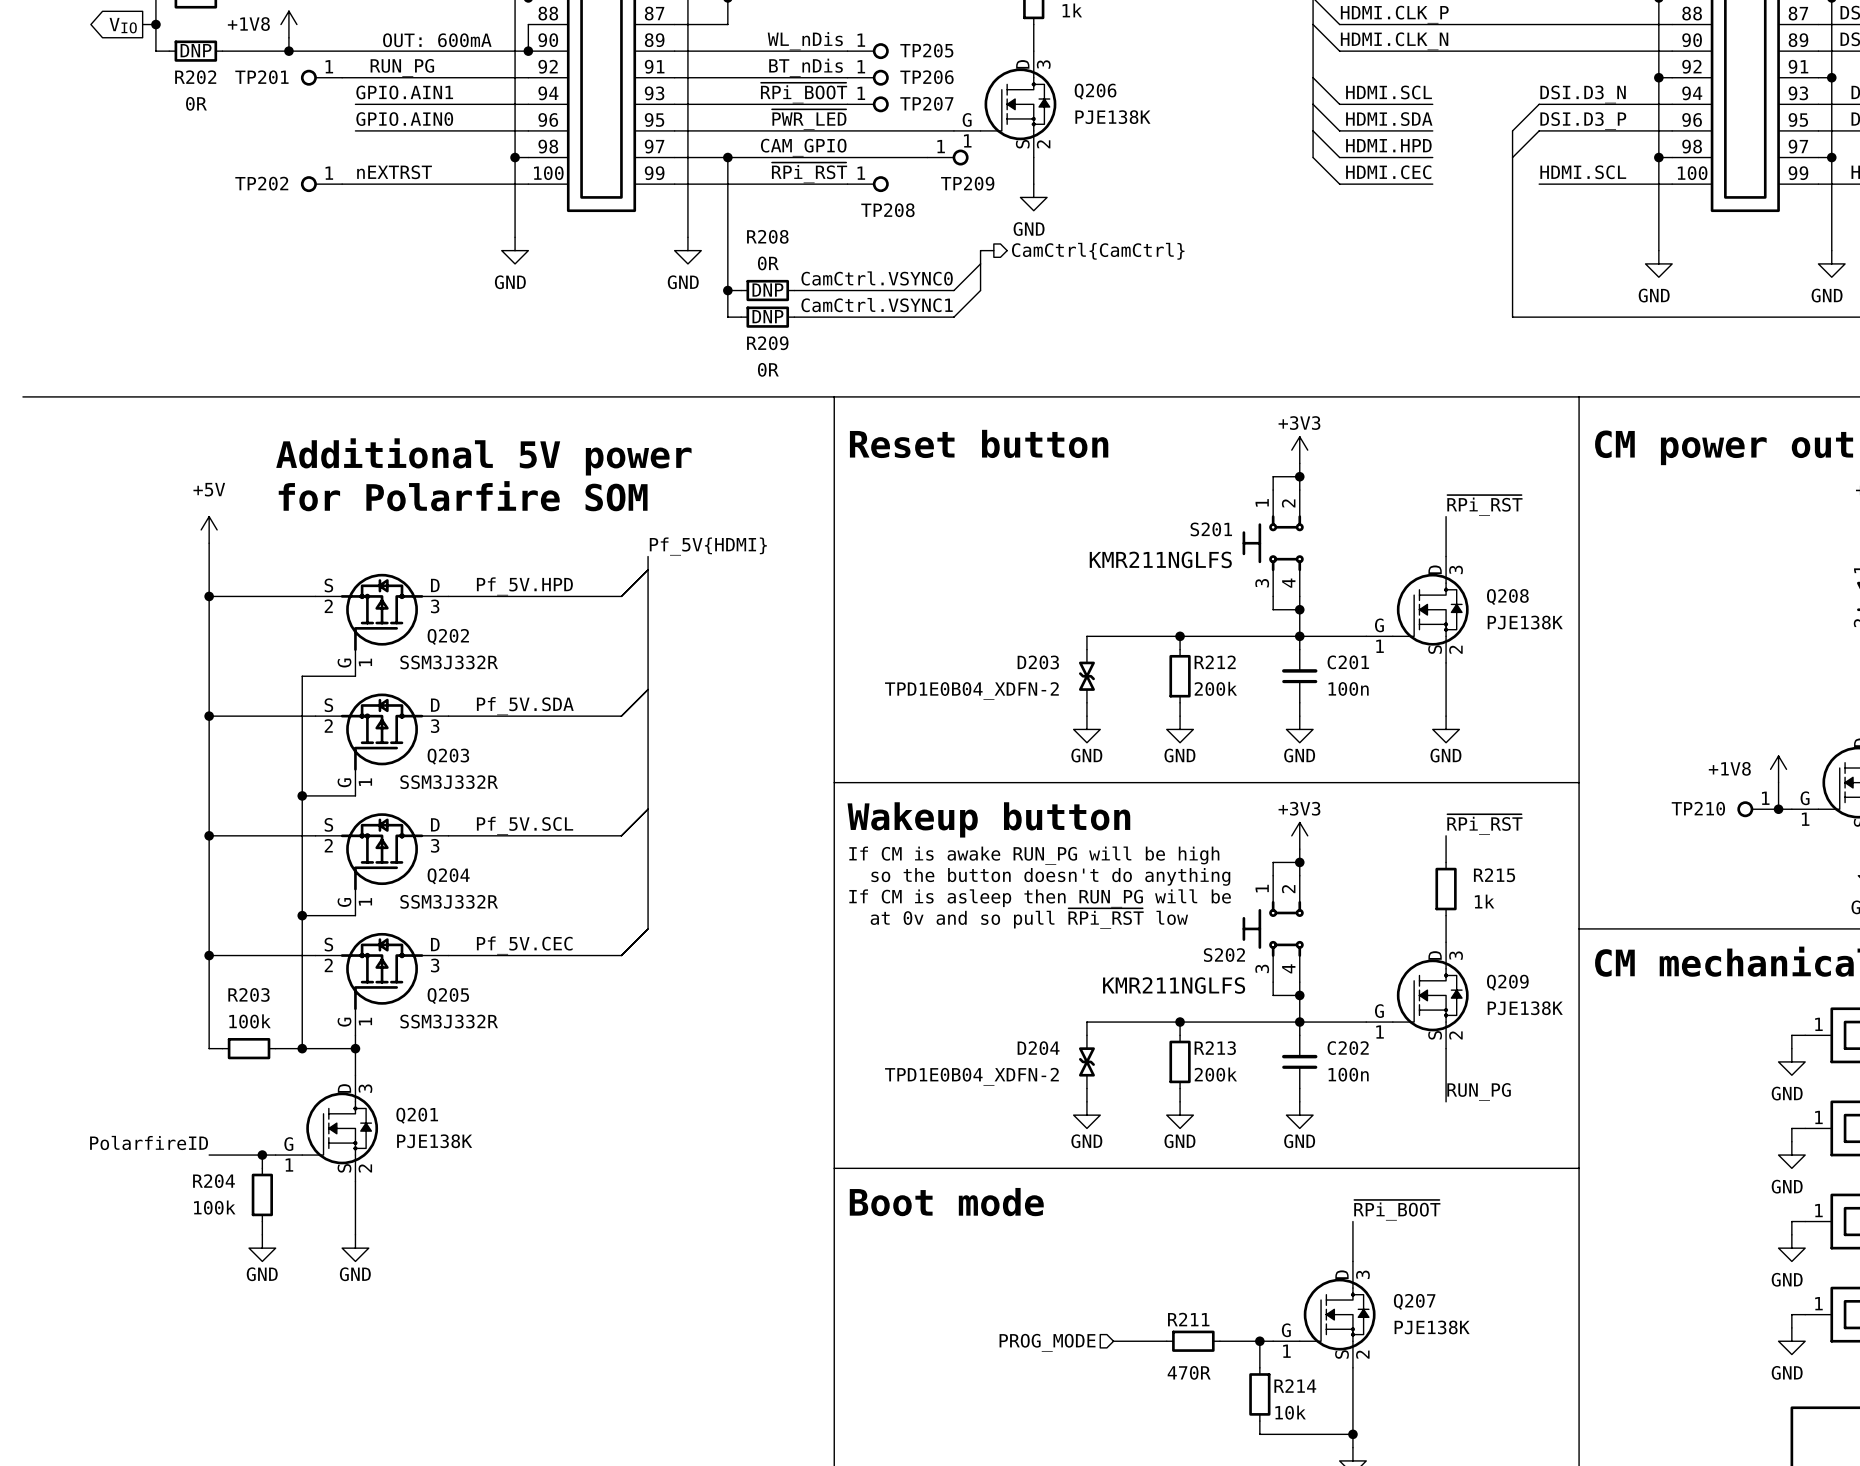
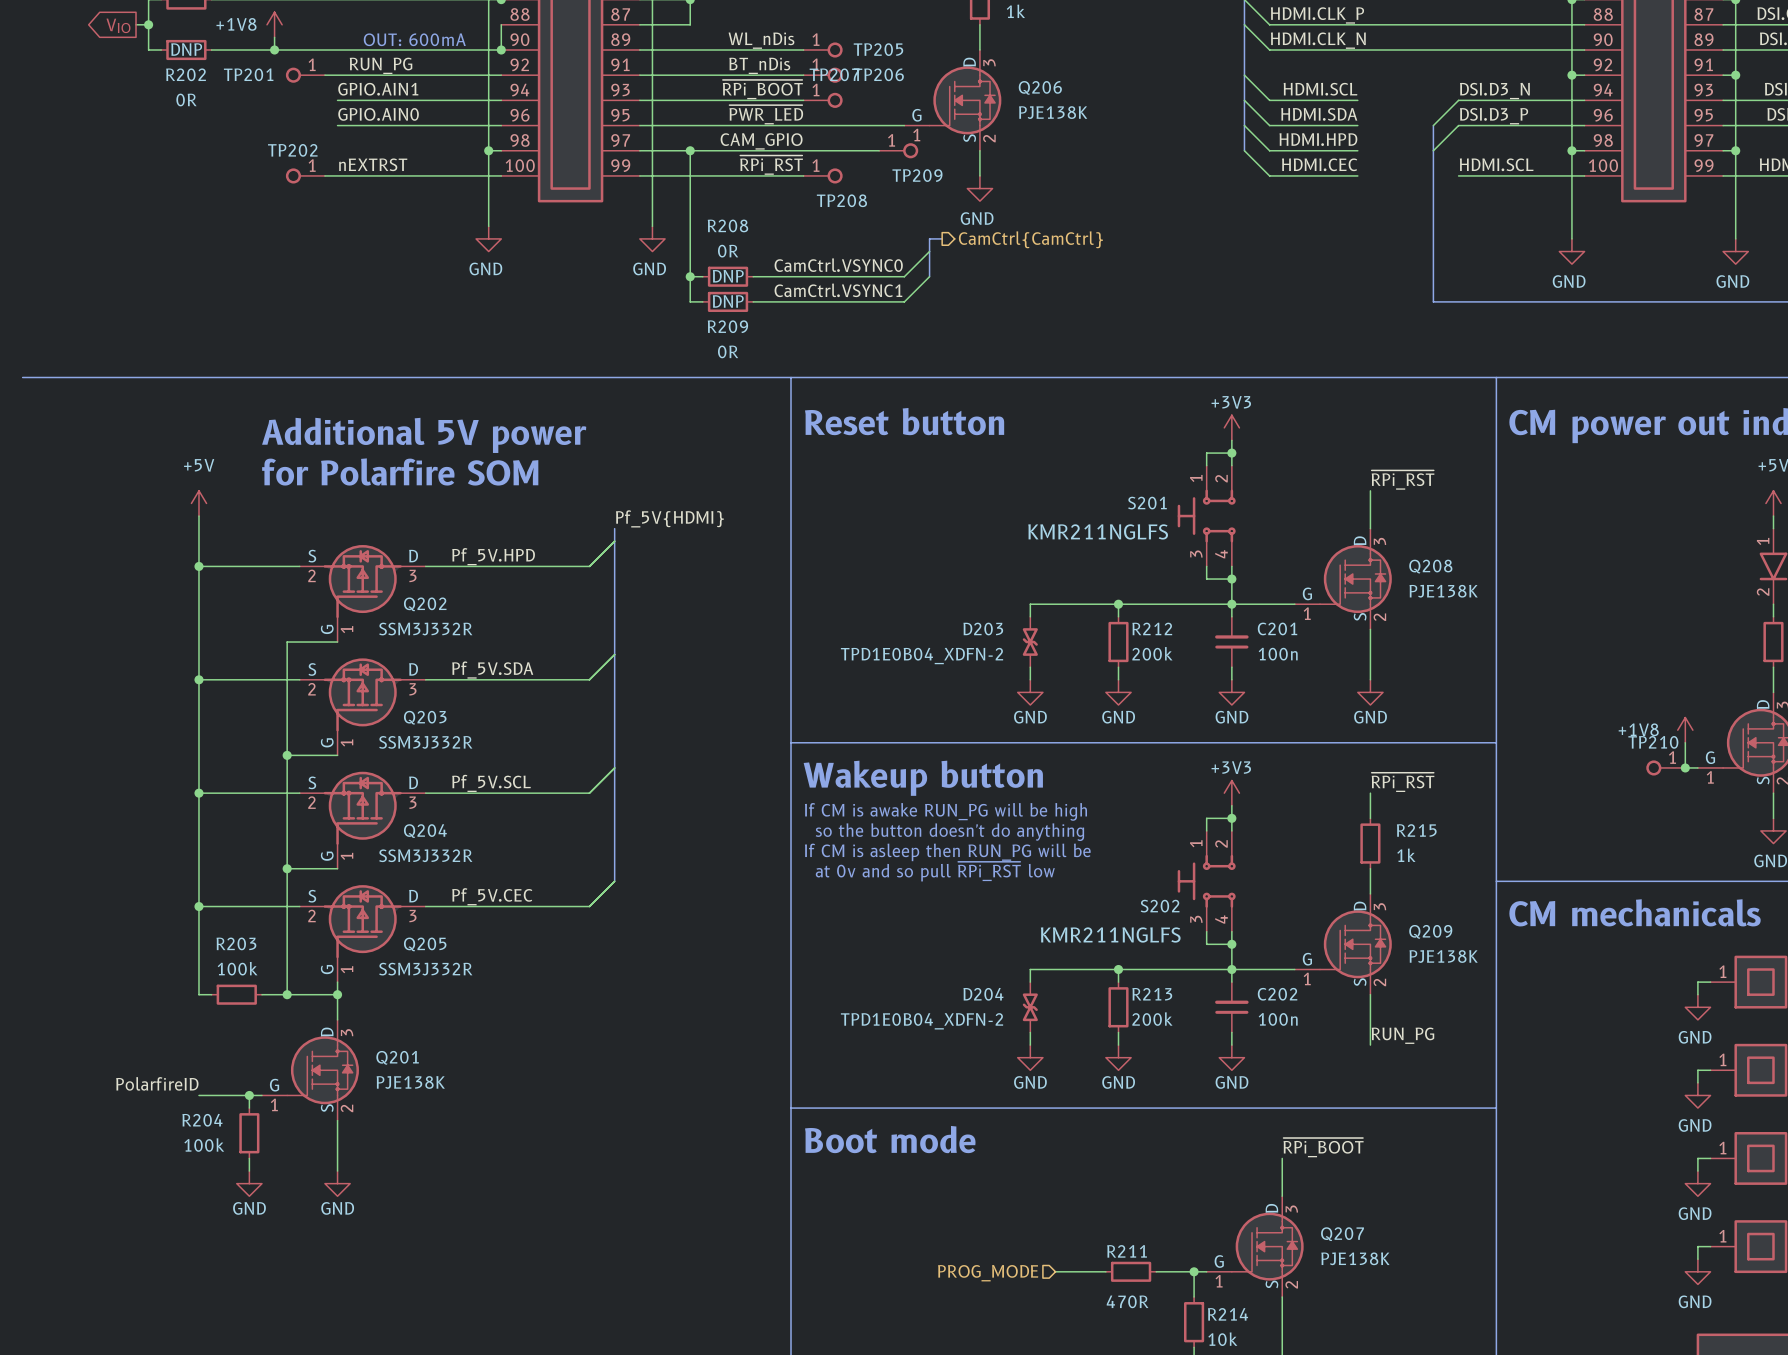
TP207 name position: TP207 (926, 103) -> TP207 (834, 74)
TP202 name position: TP202 (261, 183) -> TP202 (292, 150)
TP210 name position: TP210 (1698, 808) -> TP210 (1653, 742)

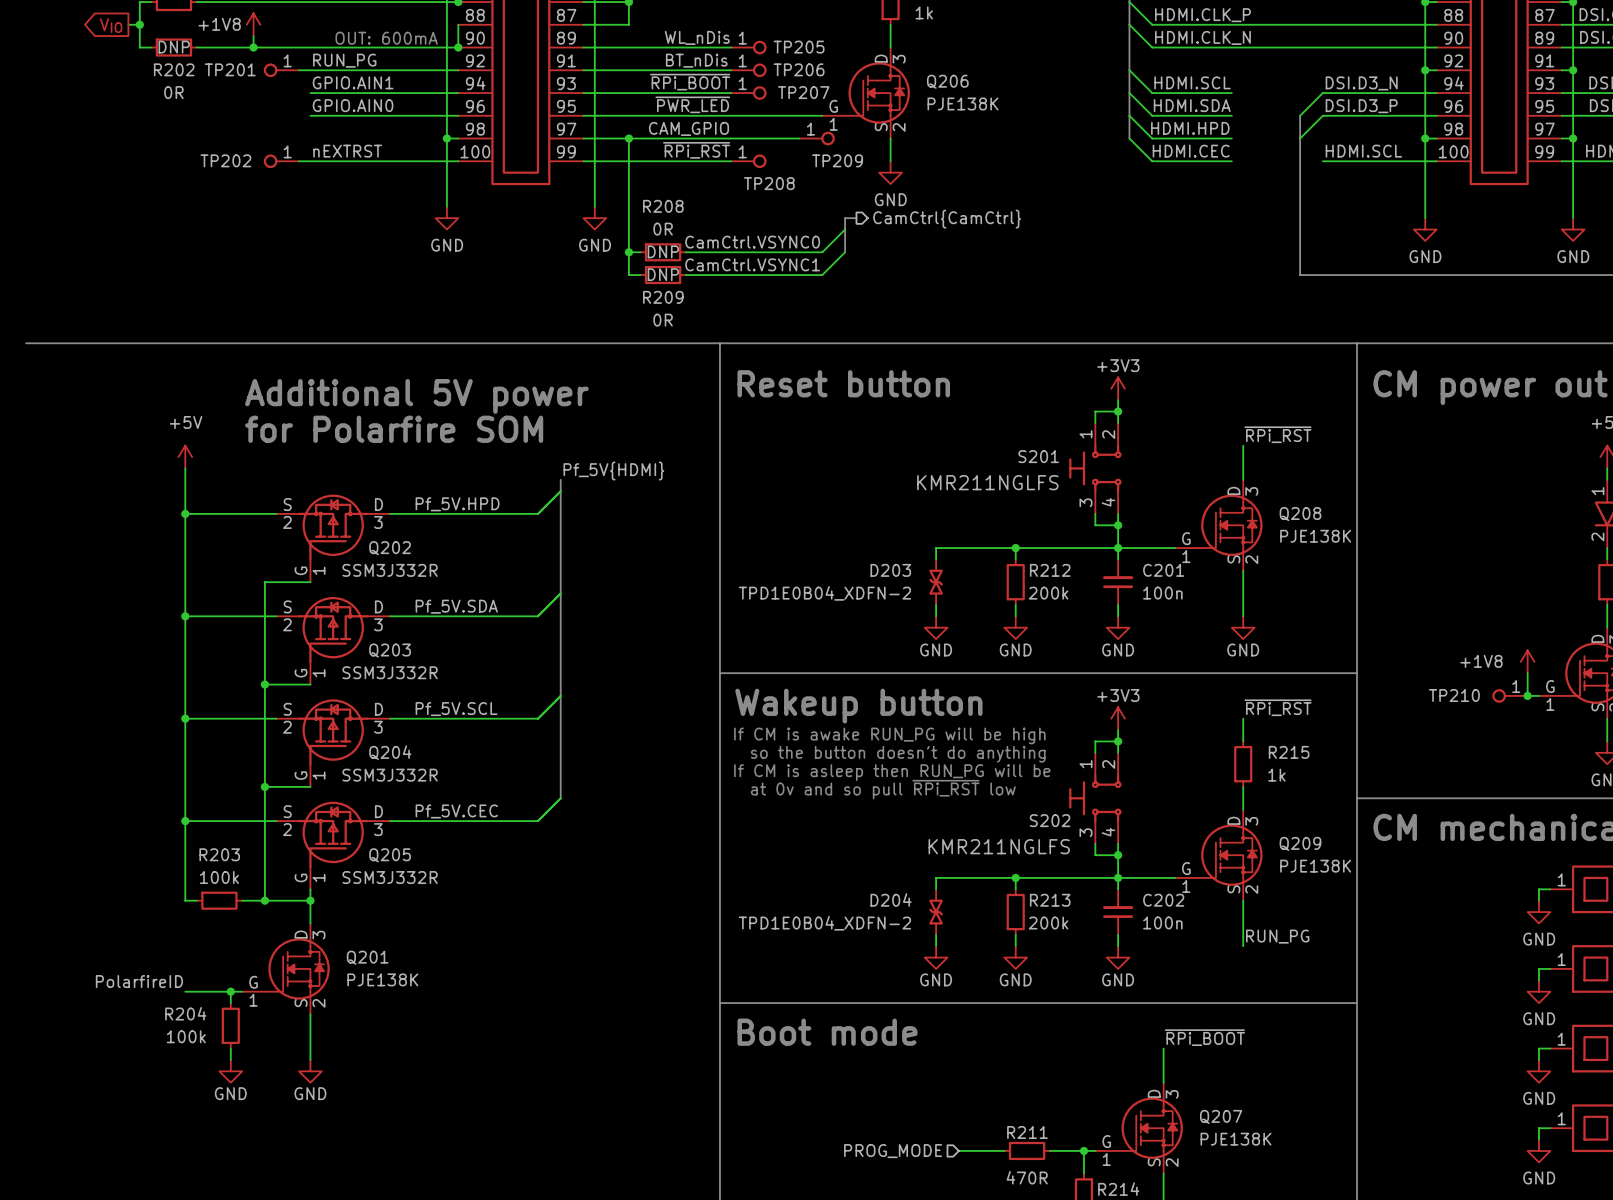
TP207 name position: TP207 (834, 74) -> TP207 (803, 92)
TP202 name position: TP202 (292, 150) -> TP202 (225, 160)
TP210 name position: TP210 (1653, 742) -> TP210 (1454, 695)

